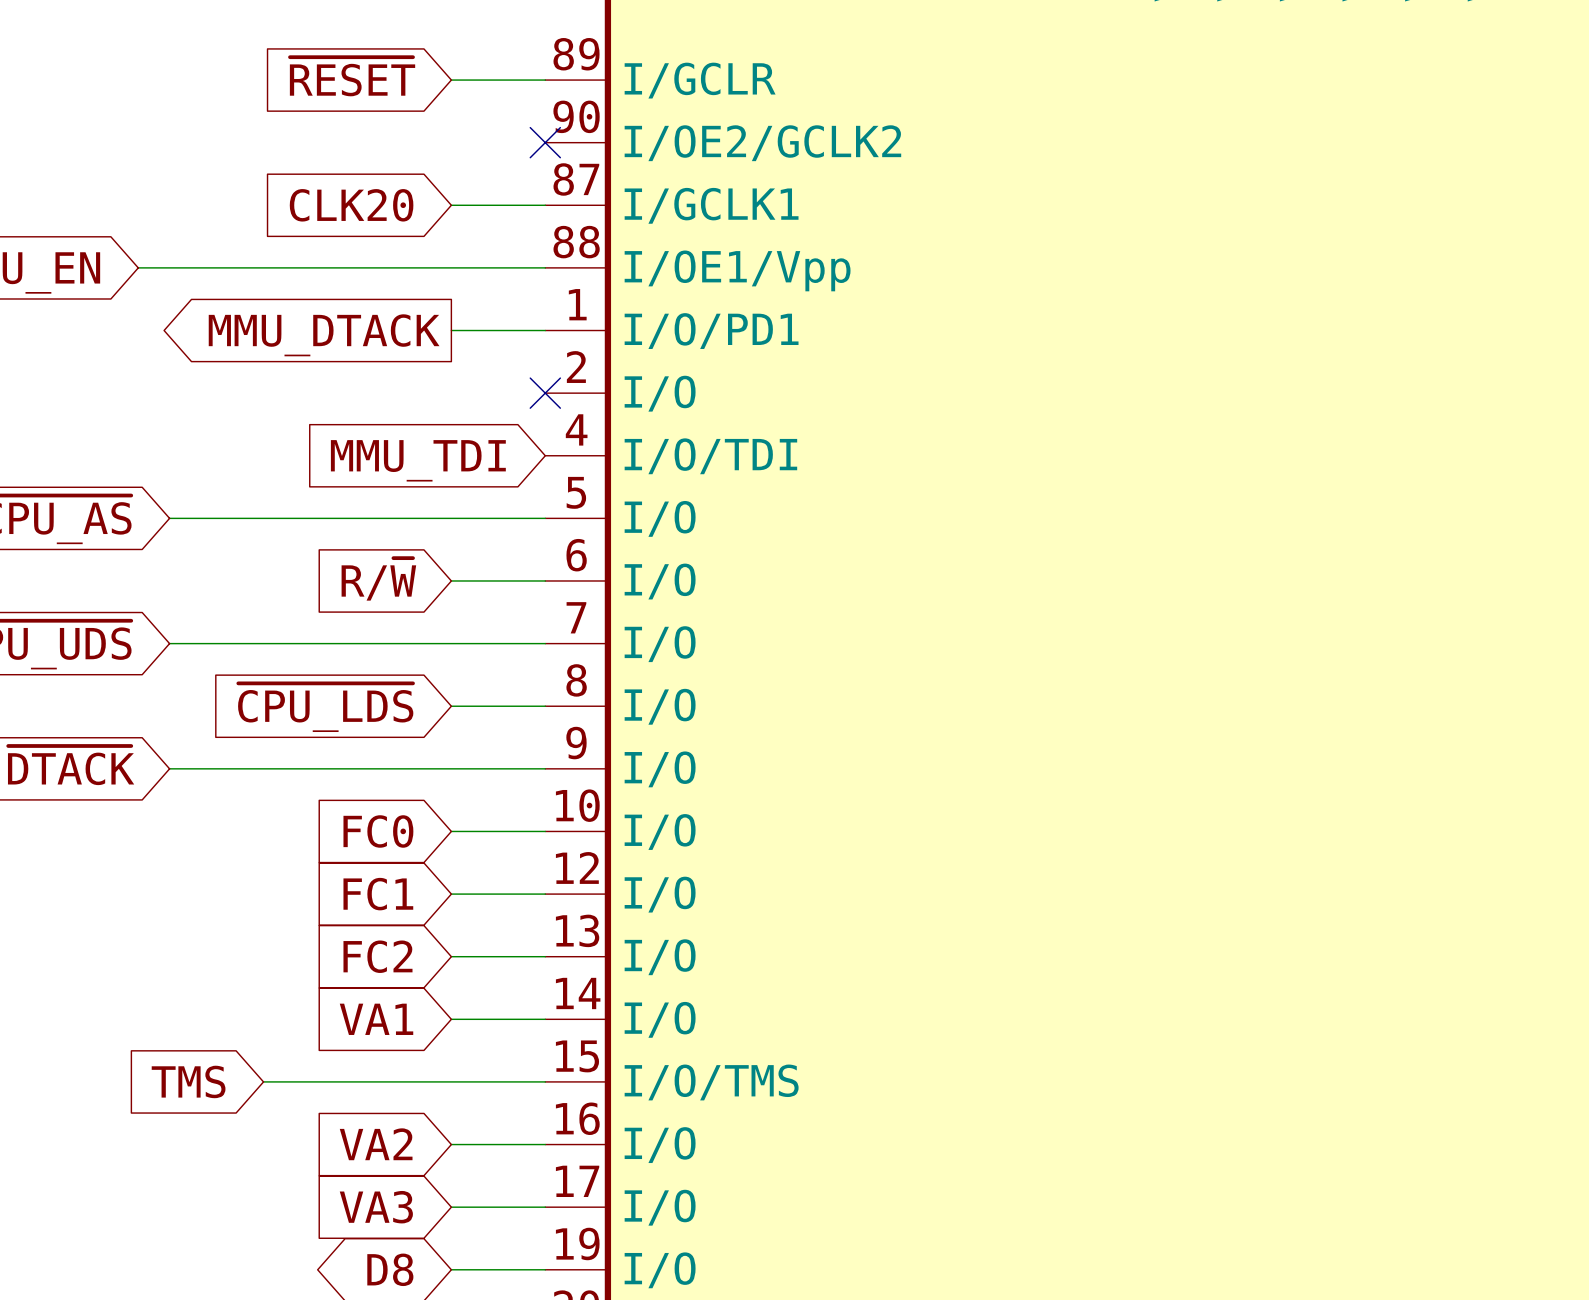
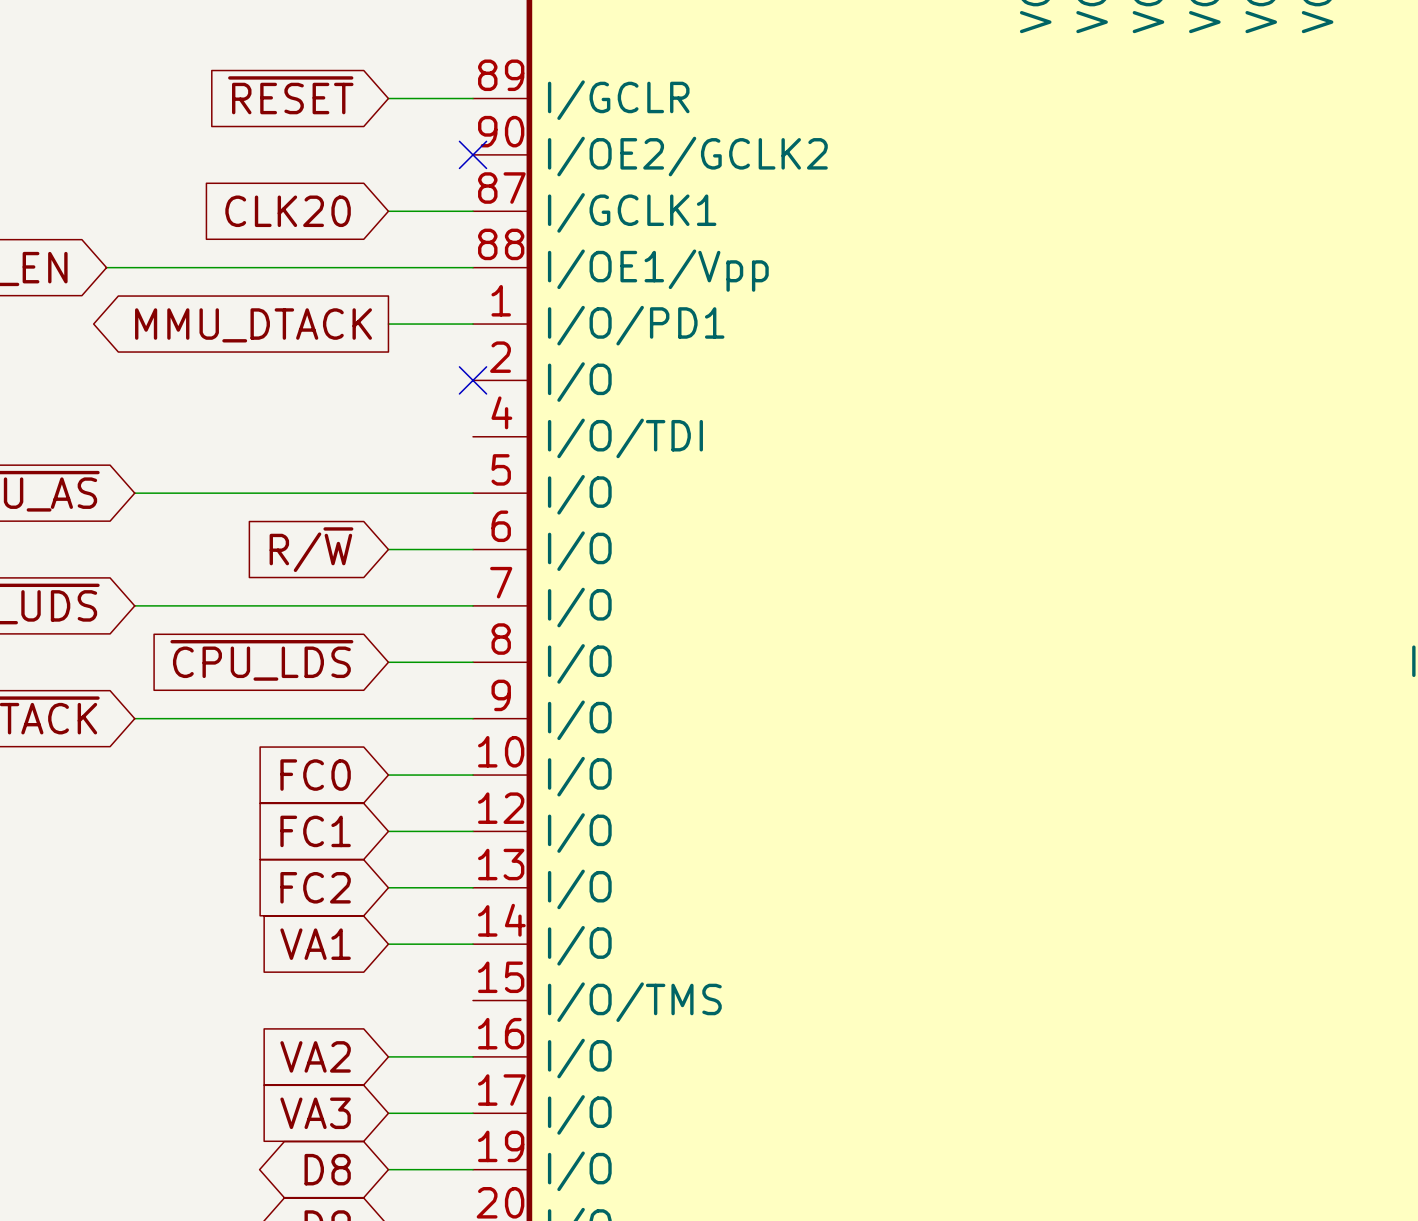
global label: MMU_TDI (418, 460) -> none
global label: TMS (188, 1081) -> none
wire: (263, 1081) (545, 1081) -> none

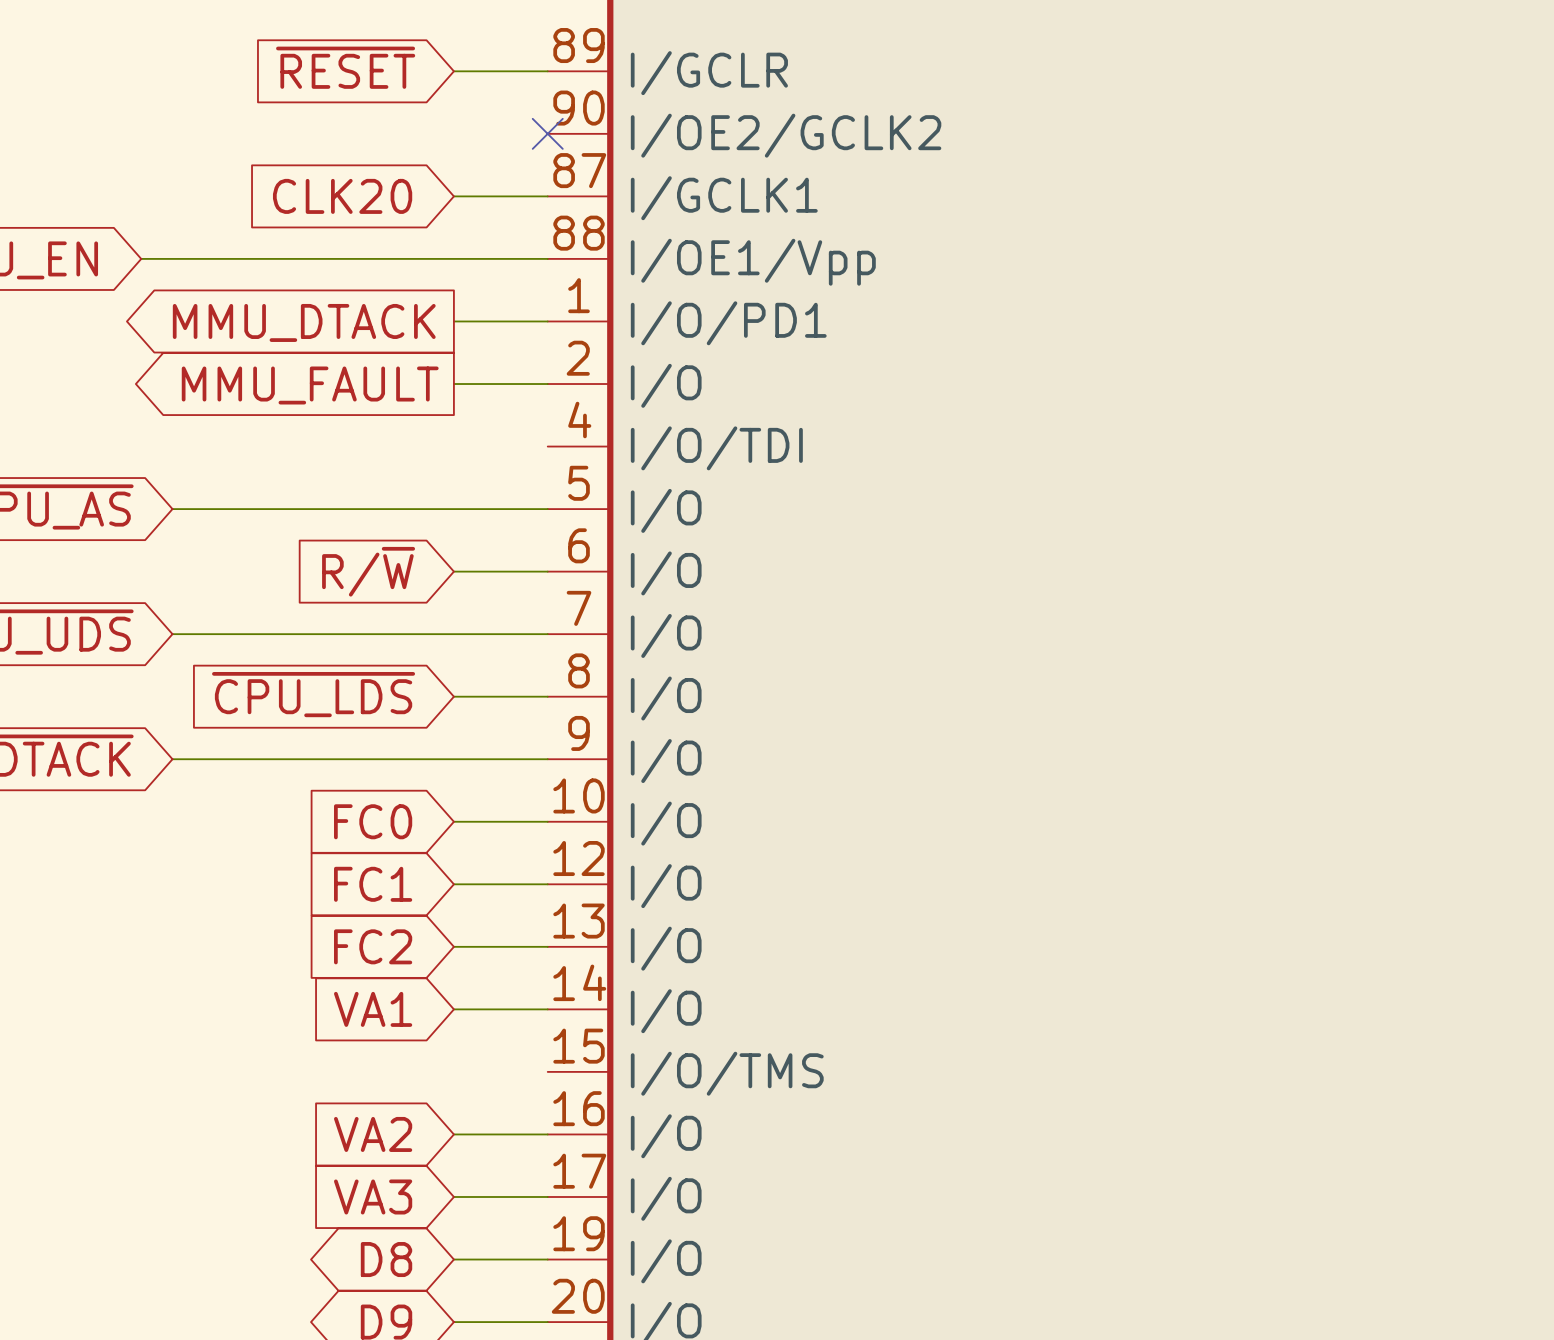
wire: none -> (453, 384) (547, 384)
no-connect mark: (473, 380) -> none
global label: none -> MMU_FAULT (310, 385)

